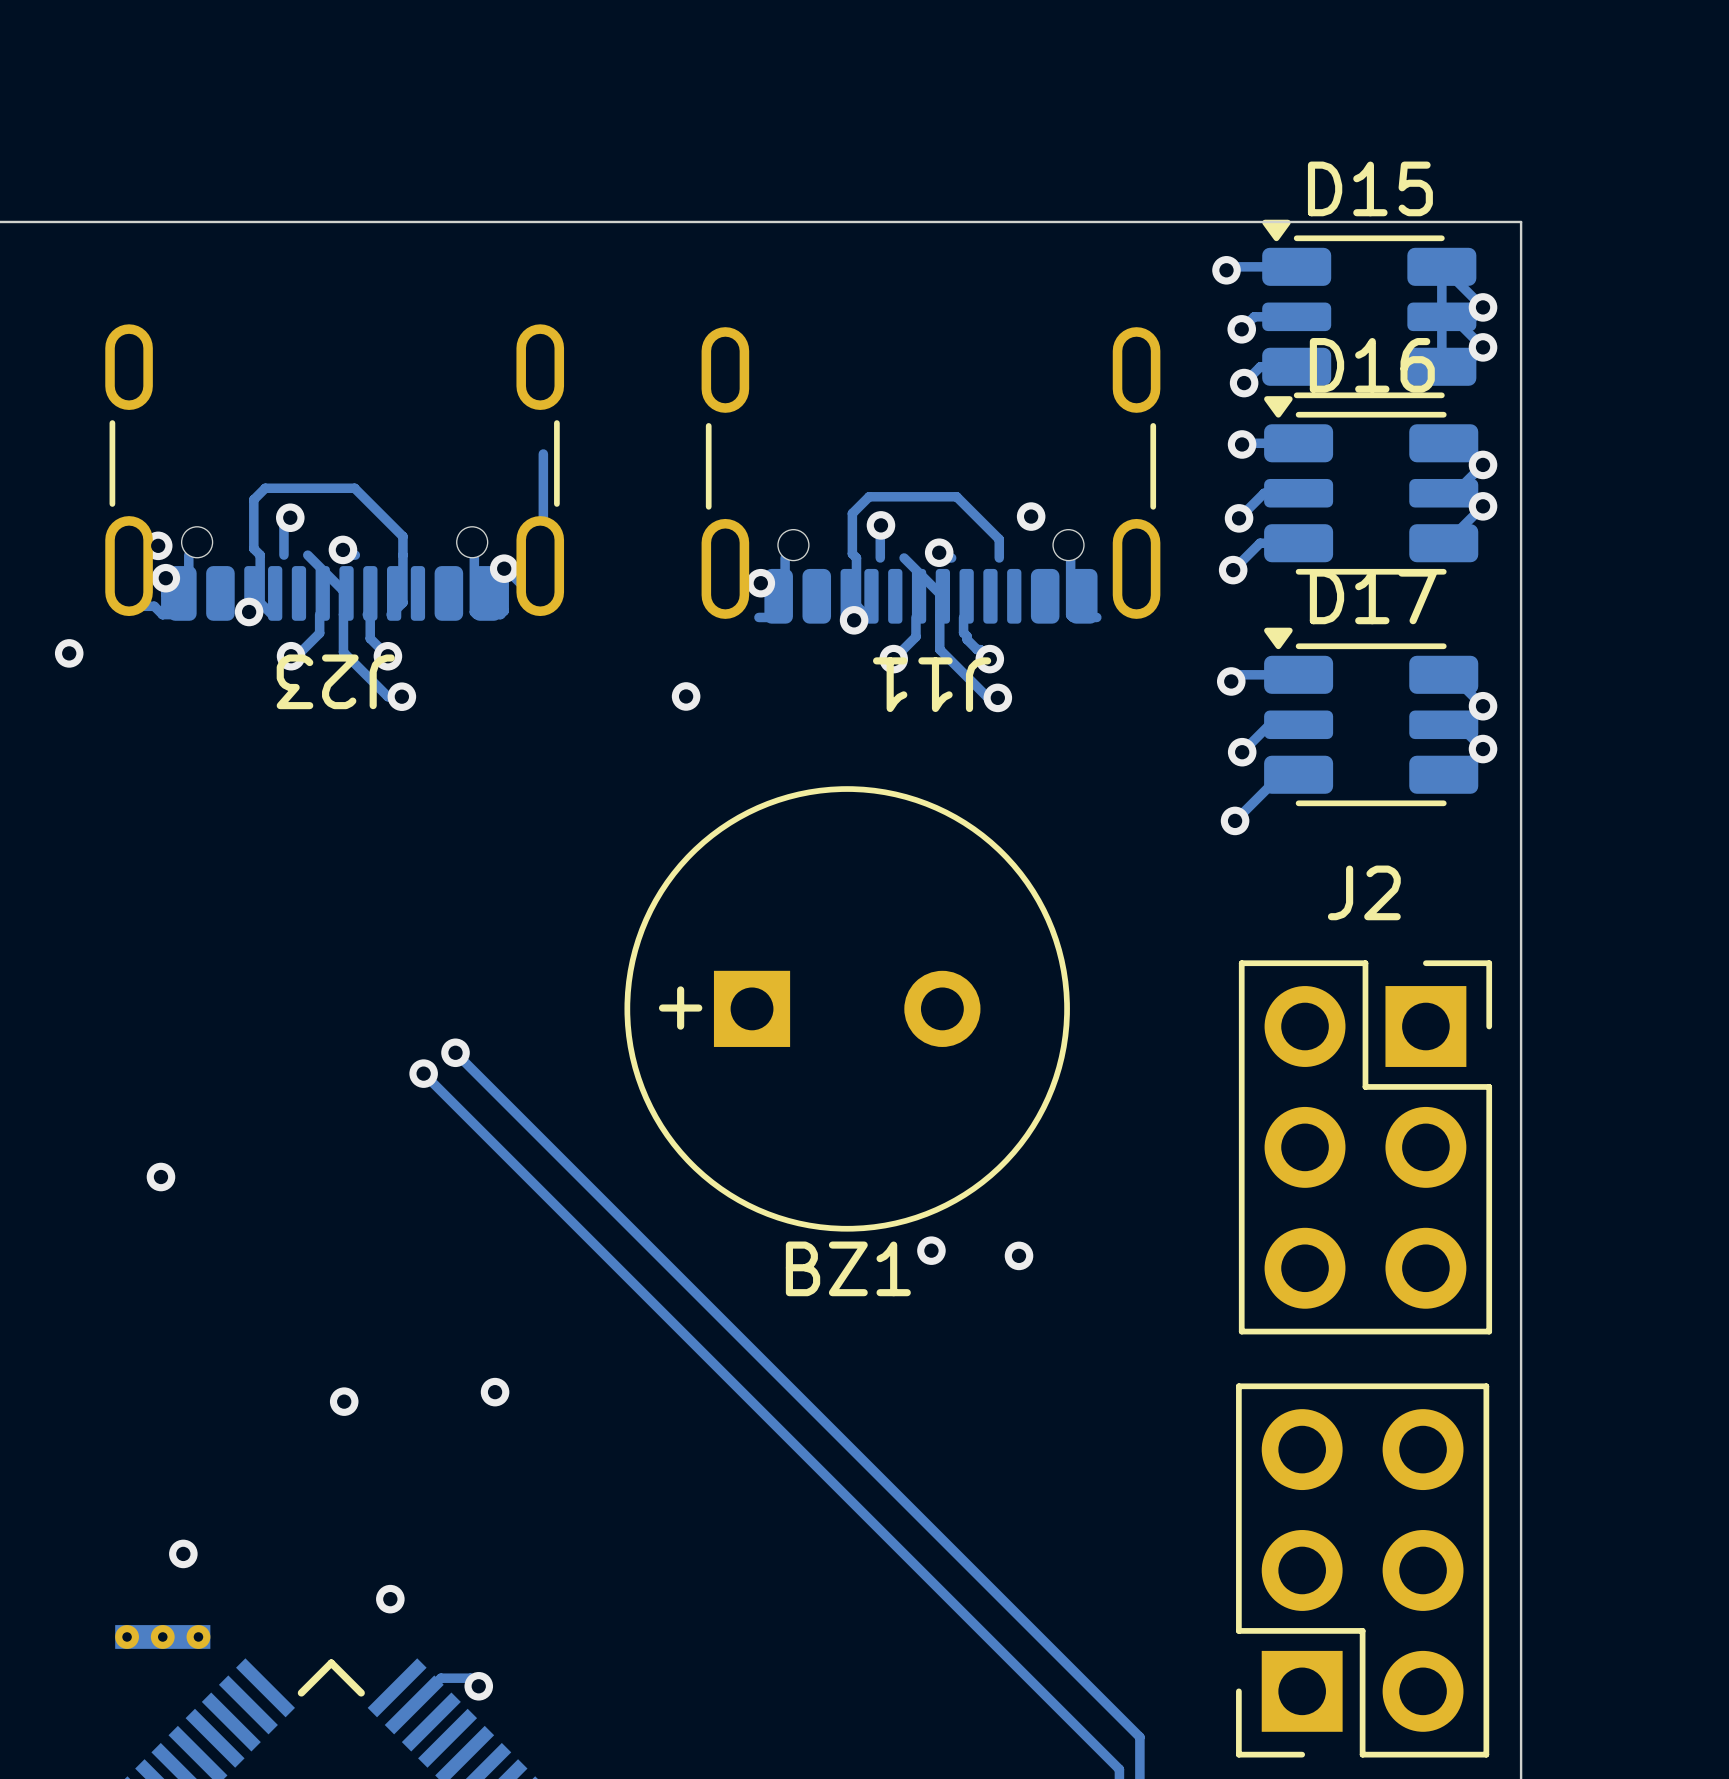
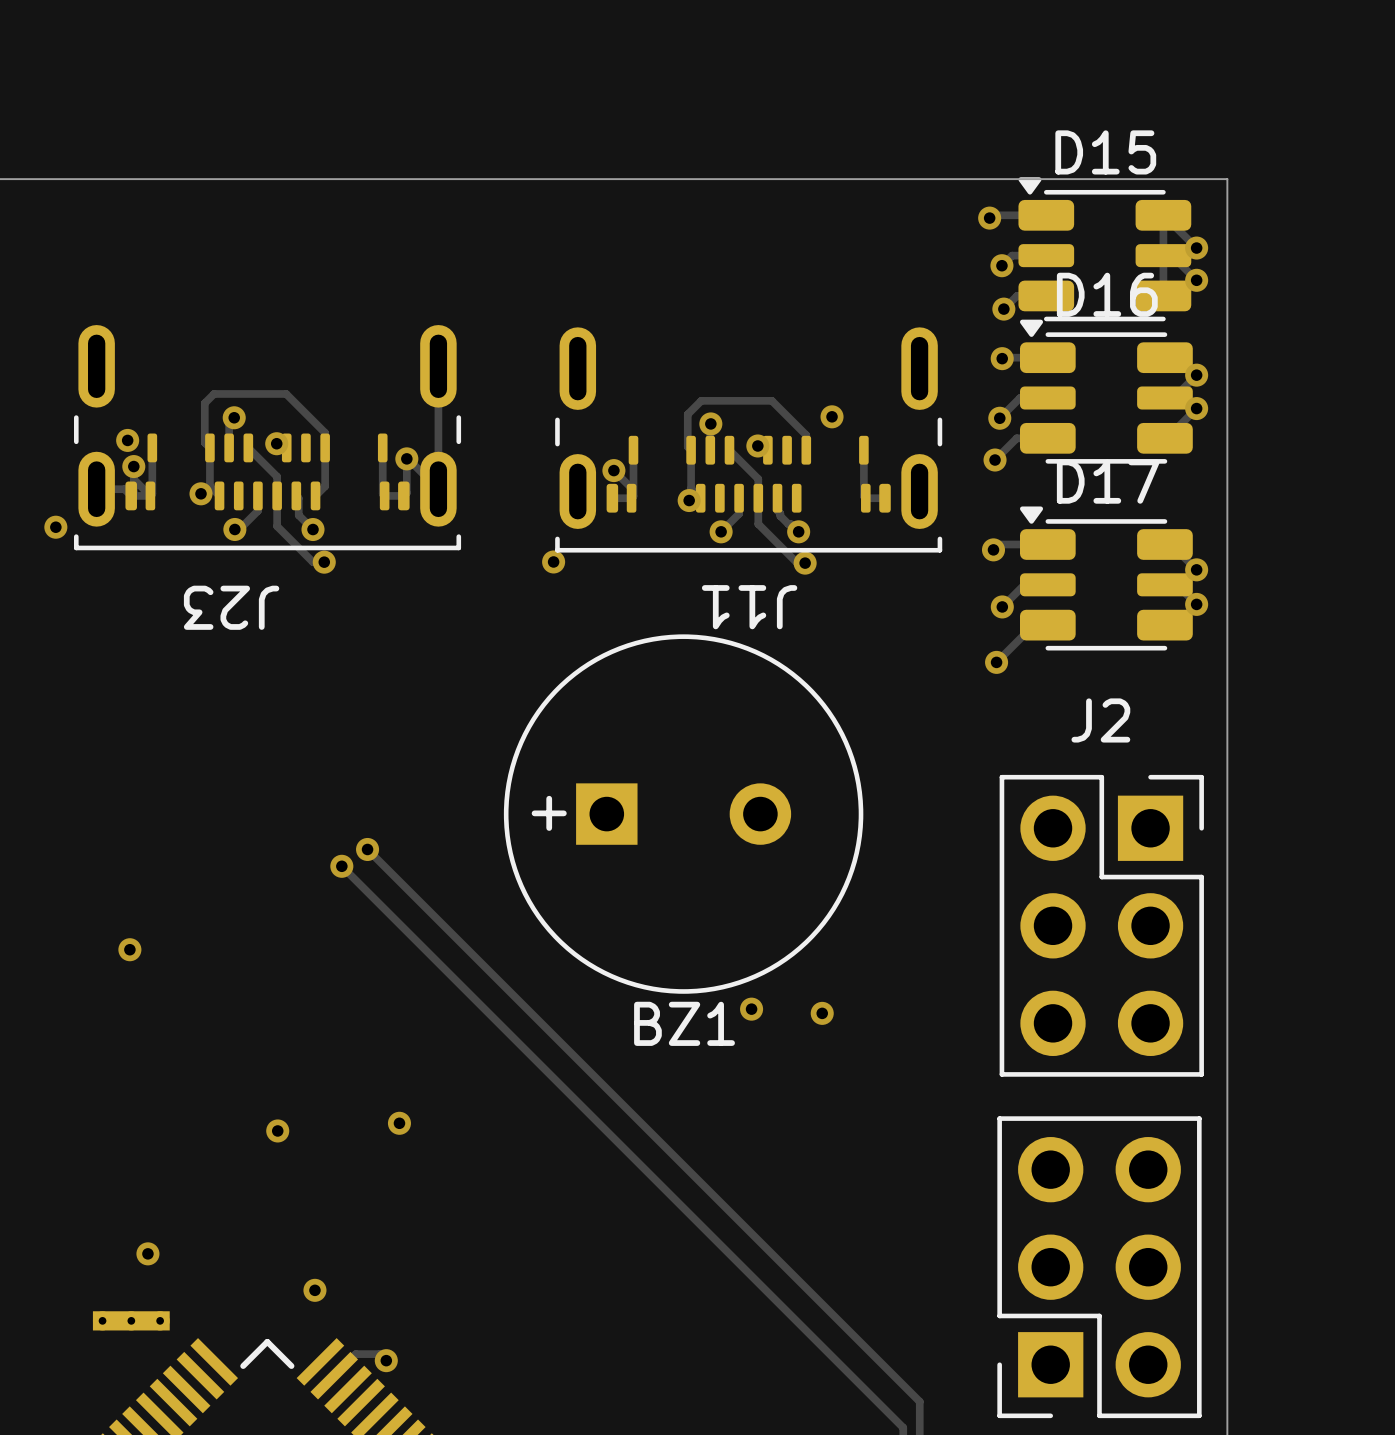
J23 footprint: [105, 324, 565, 621] -> [73, 325, 462, 551]
J11 footprint: [701, 327, 1161, 624] -> [555, 327, 943, 553]

